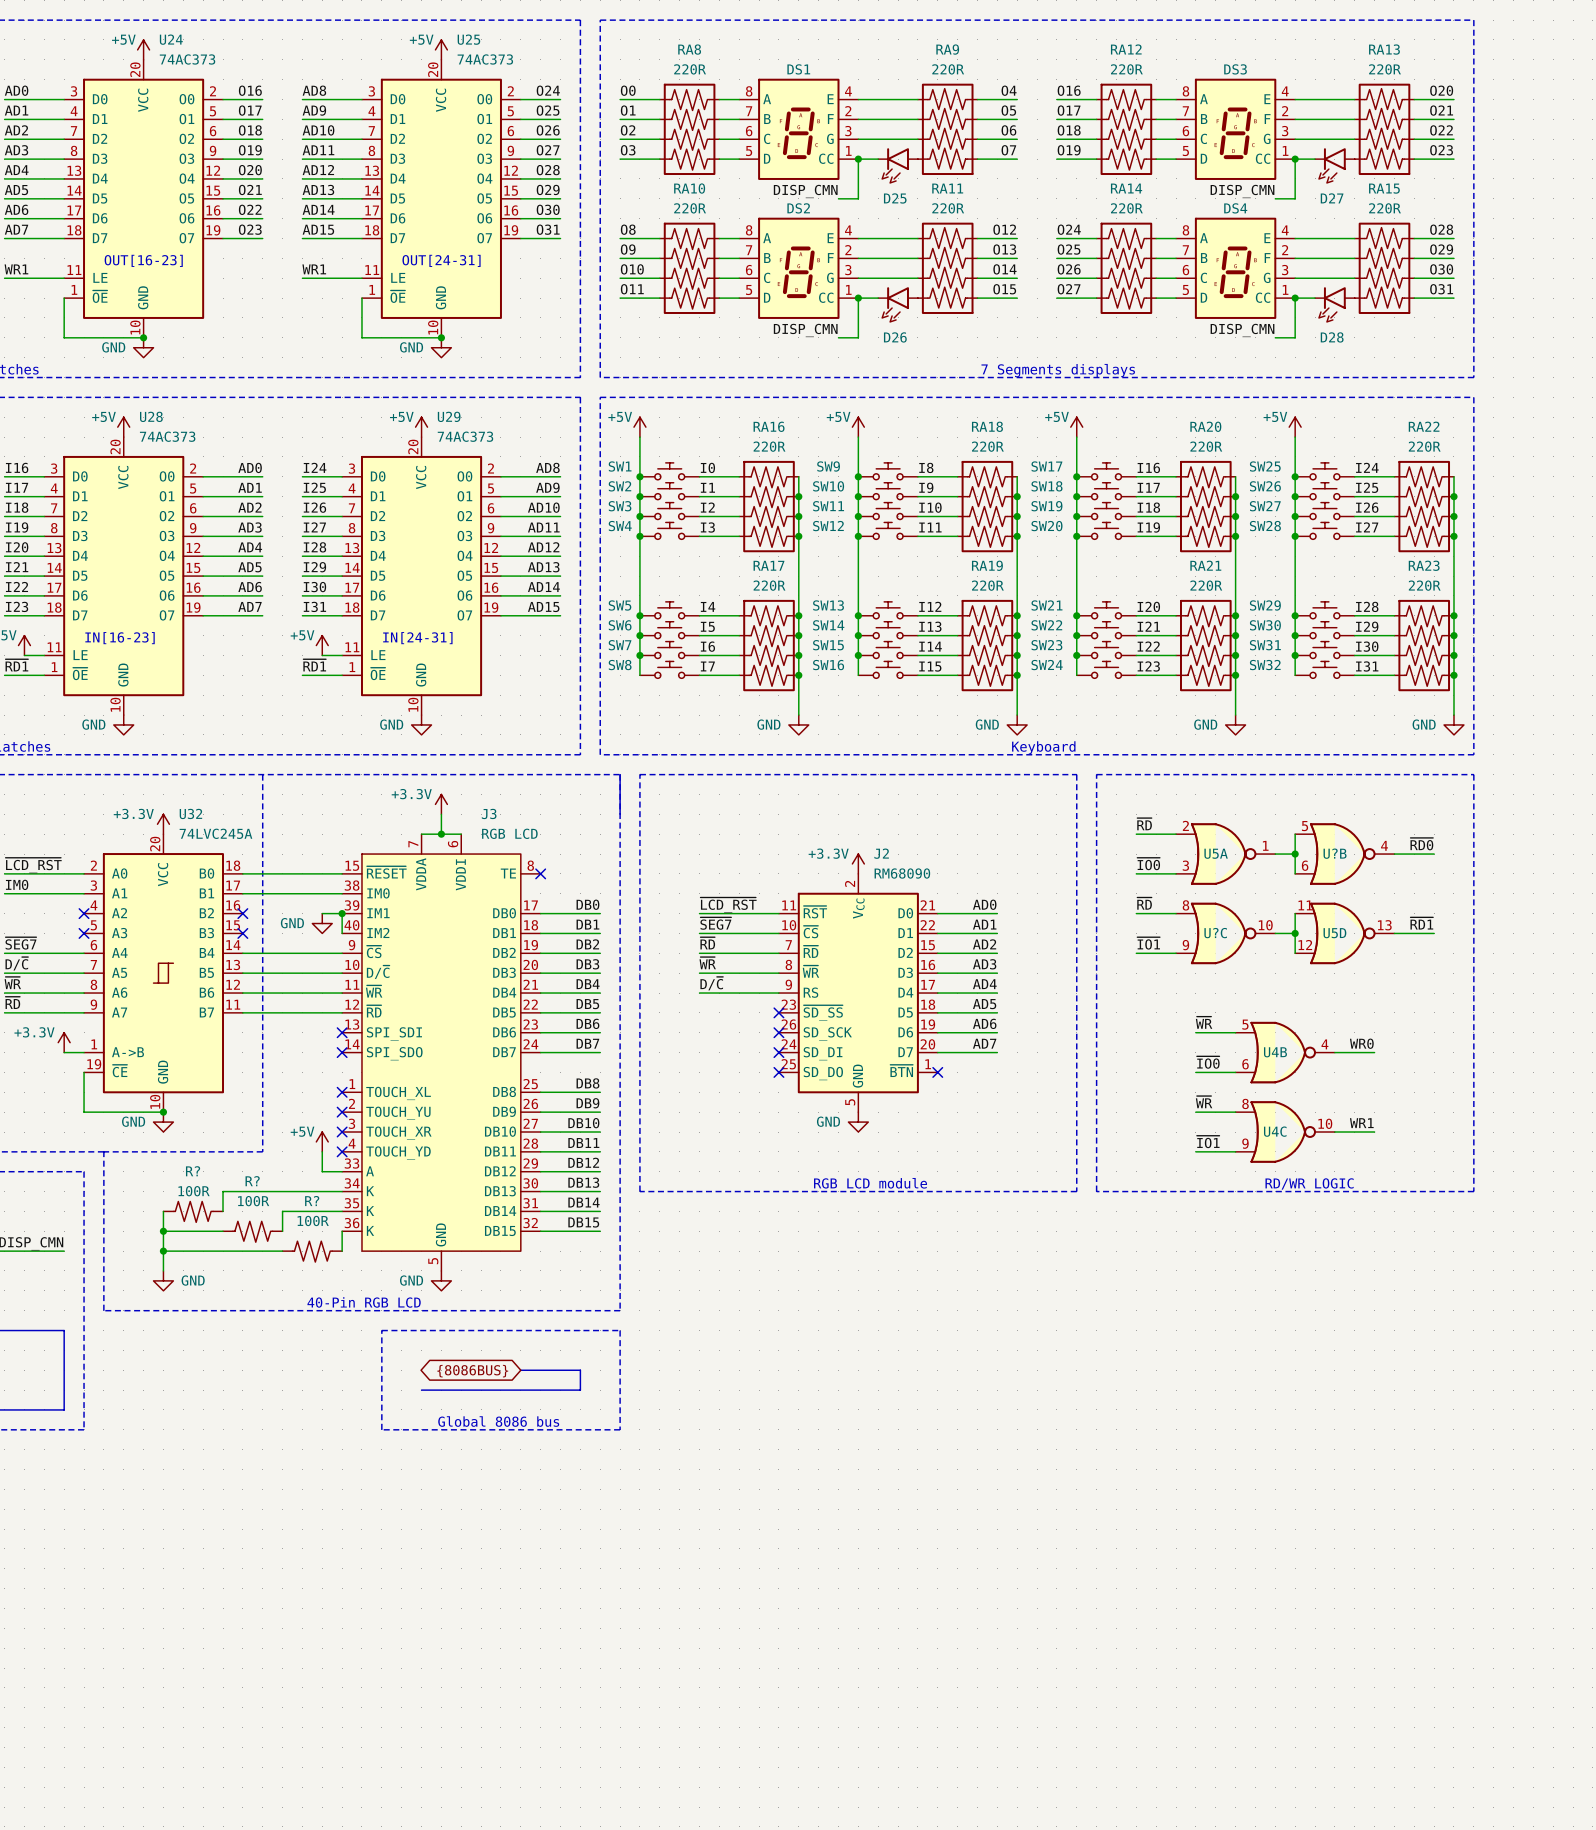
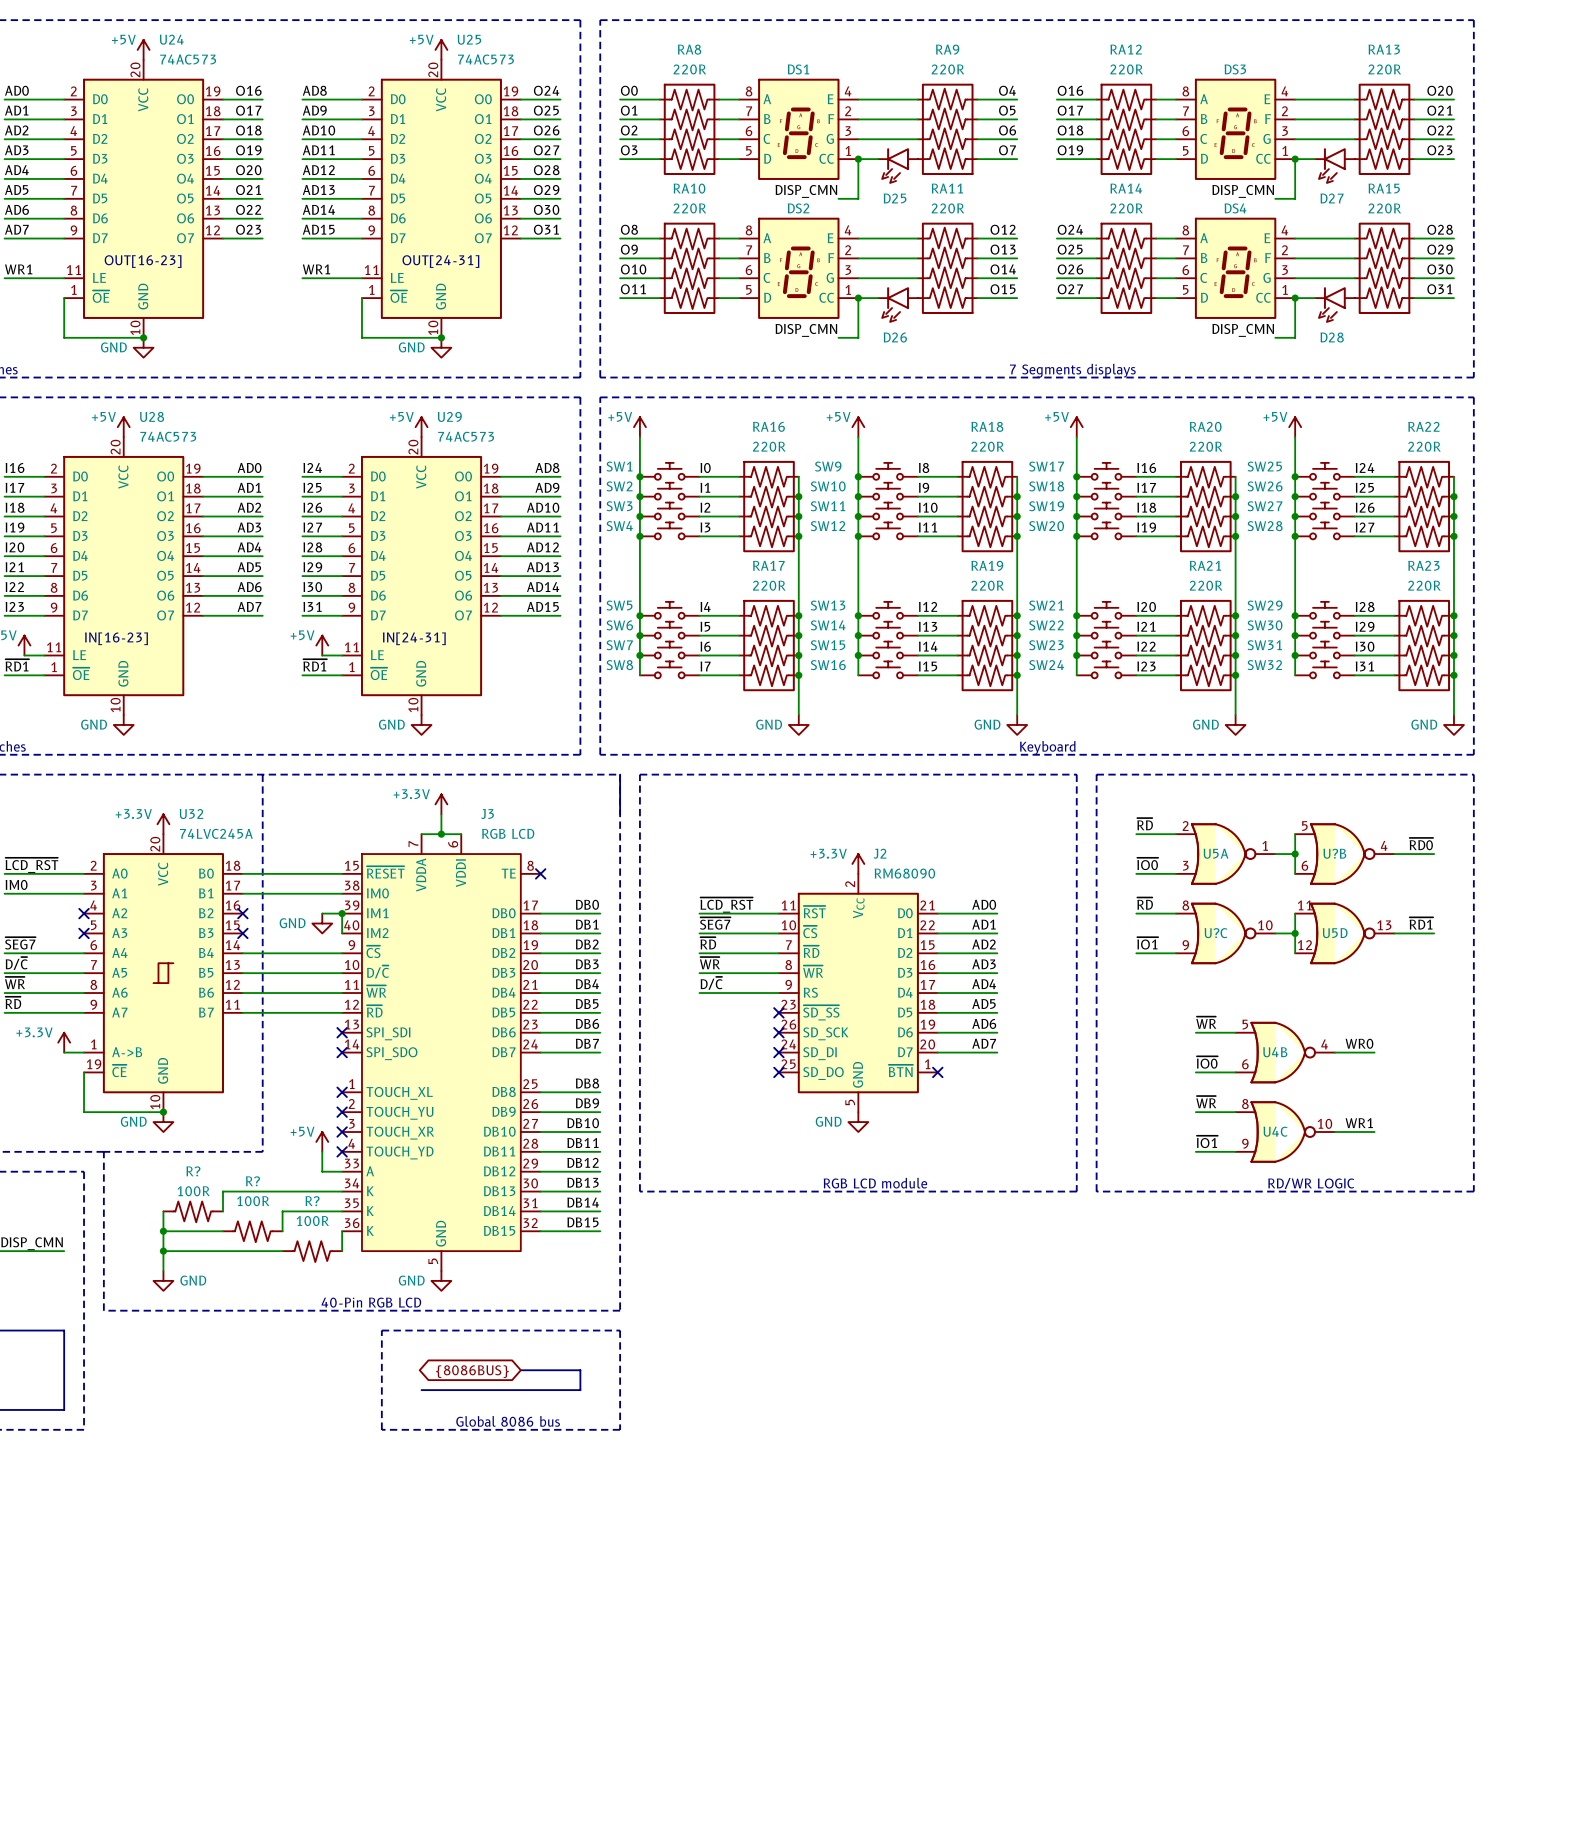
U24 symbol: [64, 59, 224, 338] -> [64, 59, 224, 338]
U24 value: 74AC373 (187, 59) -> 74AC573 (188, 59)
U25 symbol: [361, 59, 521, 338] -> [361, 59, 521, 338]
U25 value: 74AC373 (485, 59) -> 74AC573 (485, 59)
U28 value: 74AC373 (167, 436) -> 74AC573 (168, 436)
U29 value: 74AC373 (465, 436) -> 74AC573 (466, 436)
U28 symbol: [44, 437, 204, 716] -> [44, 437, 204, 716]
U29 symbol: [342, 437, 501, 716] -> [342, 437, 501, 716]

